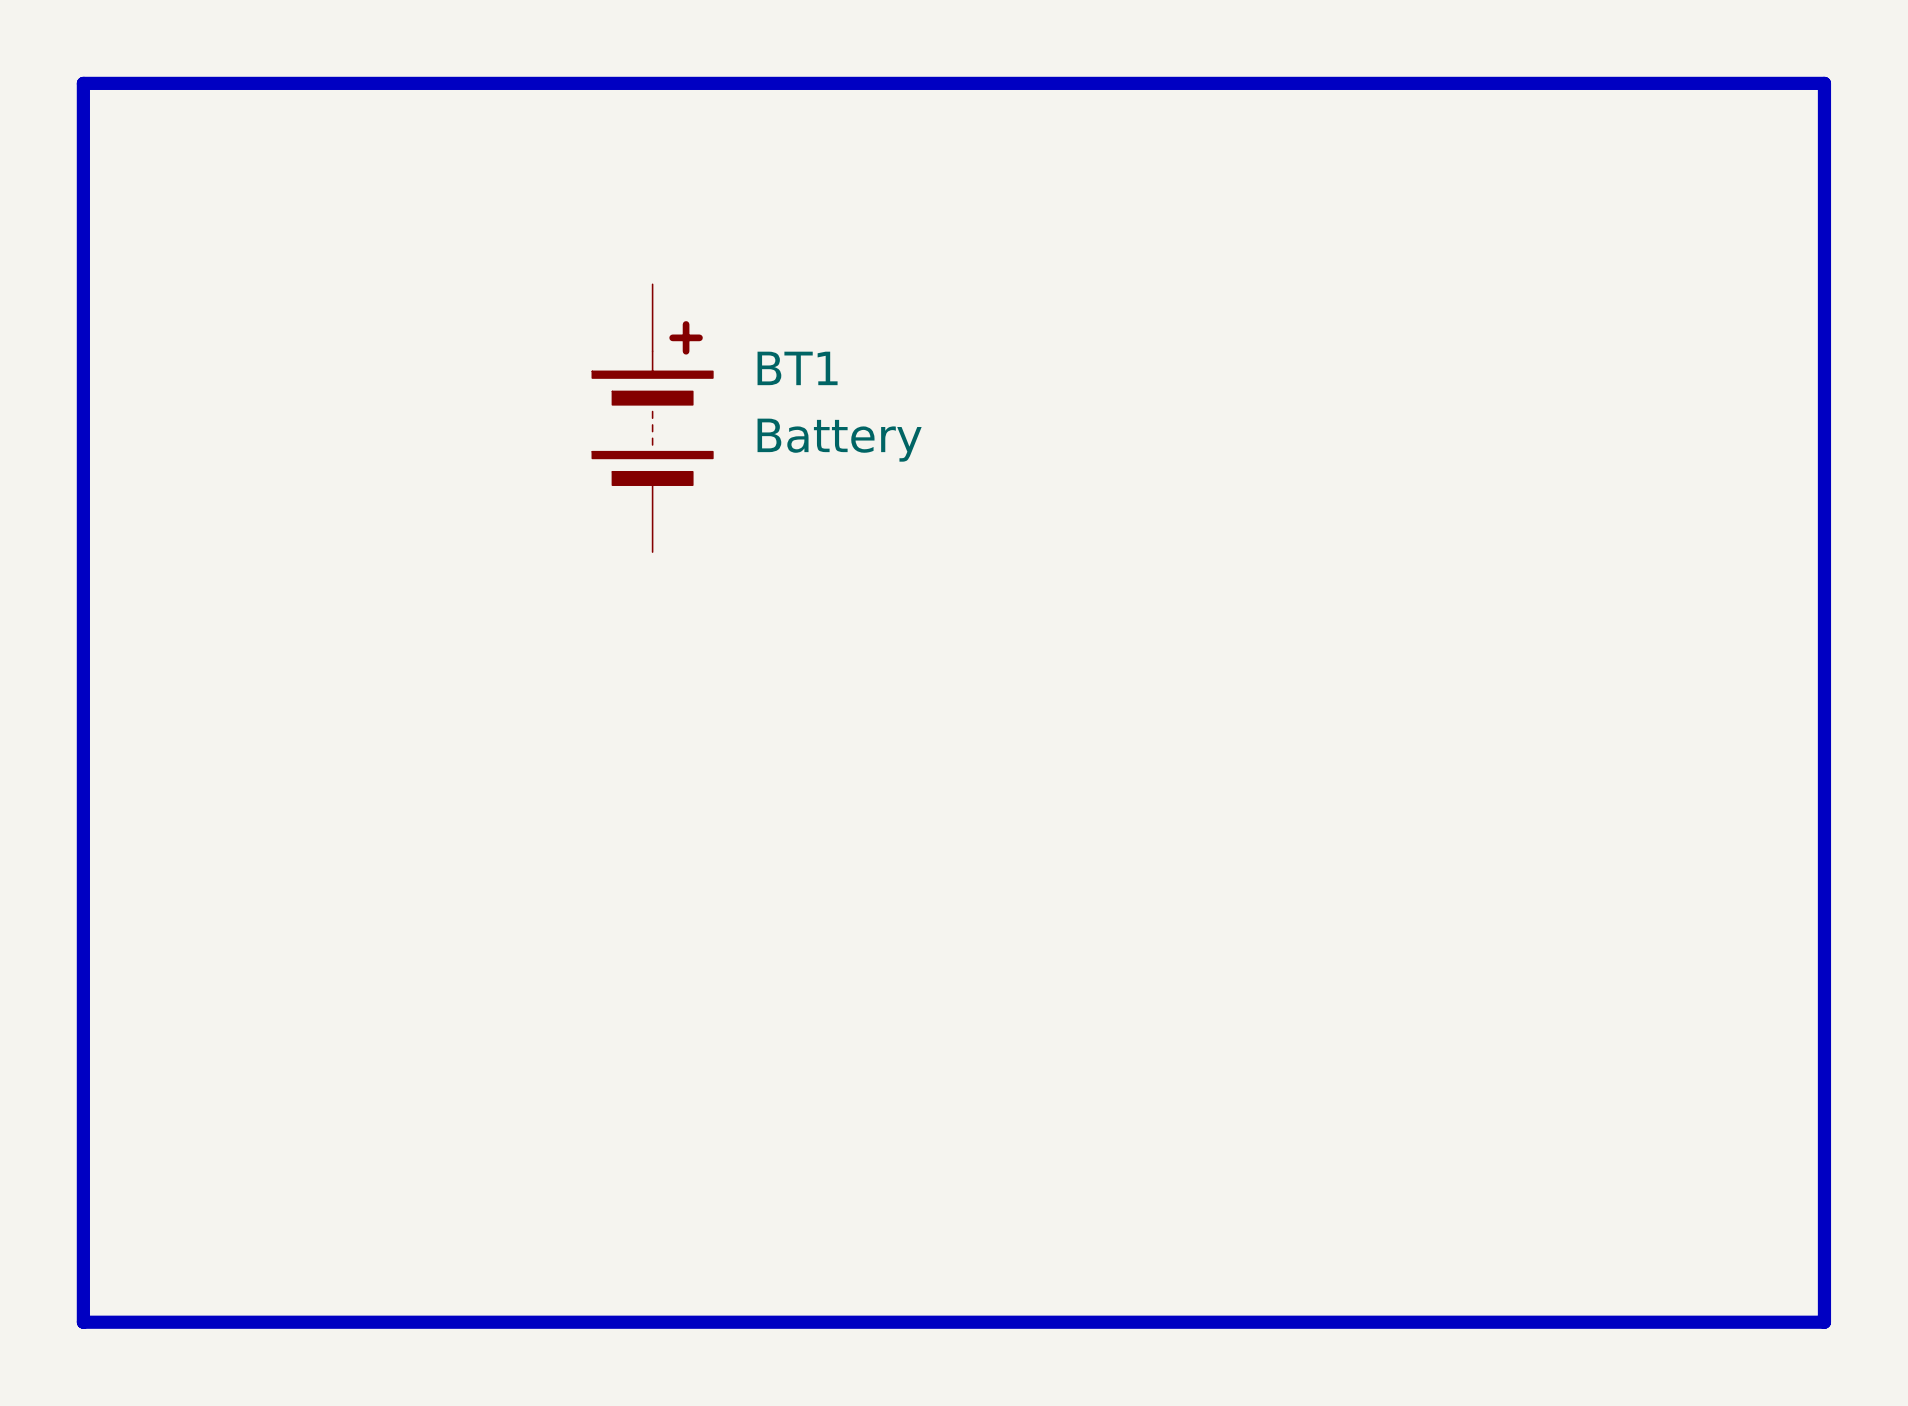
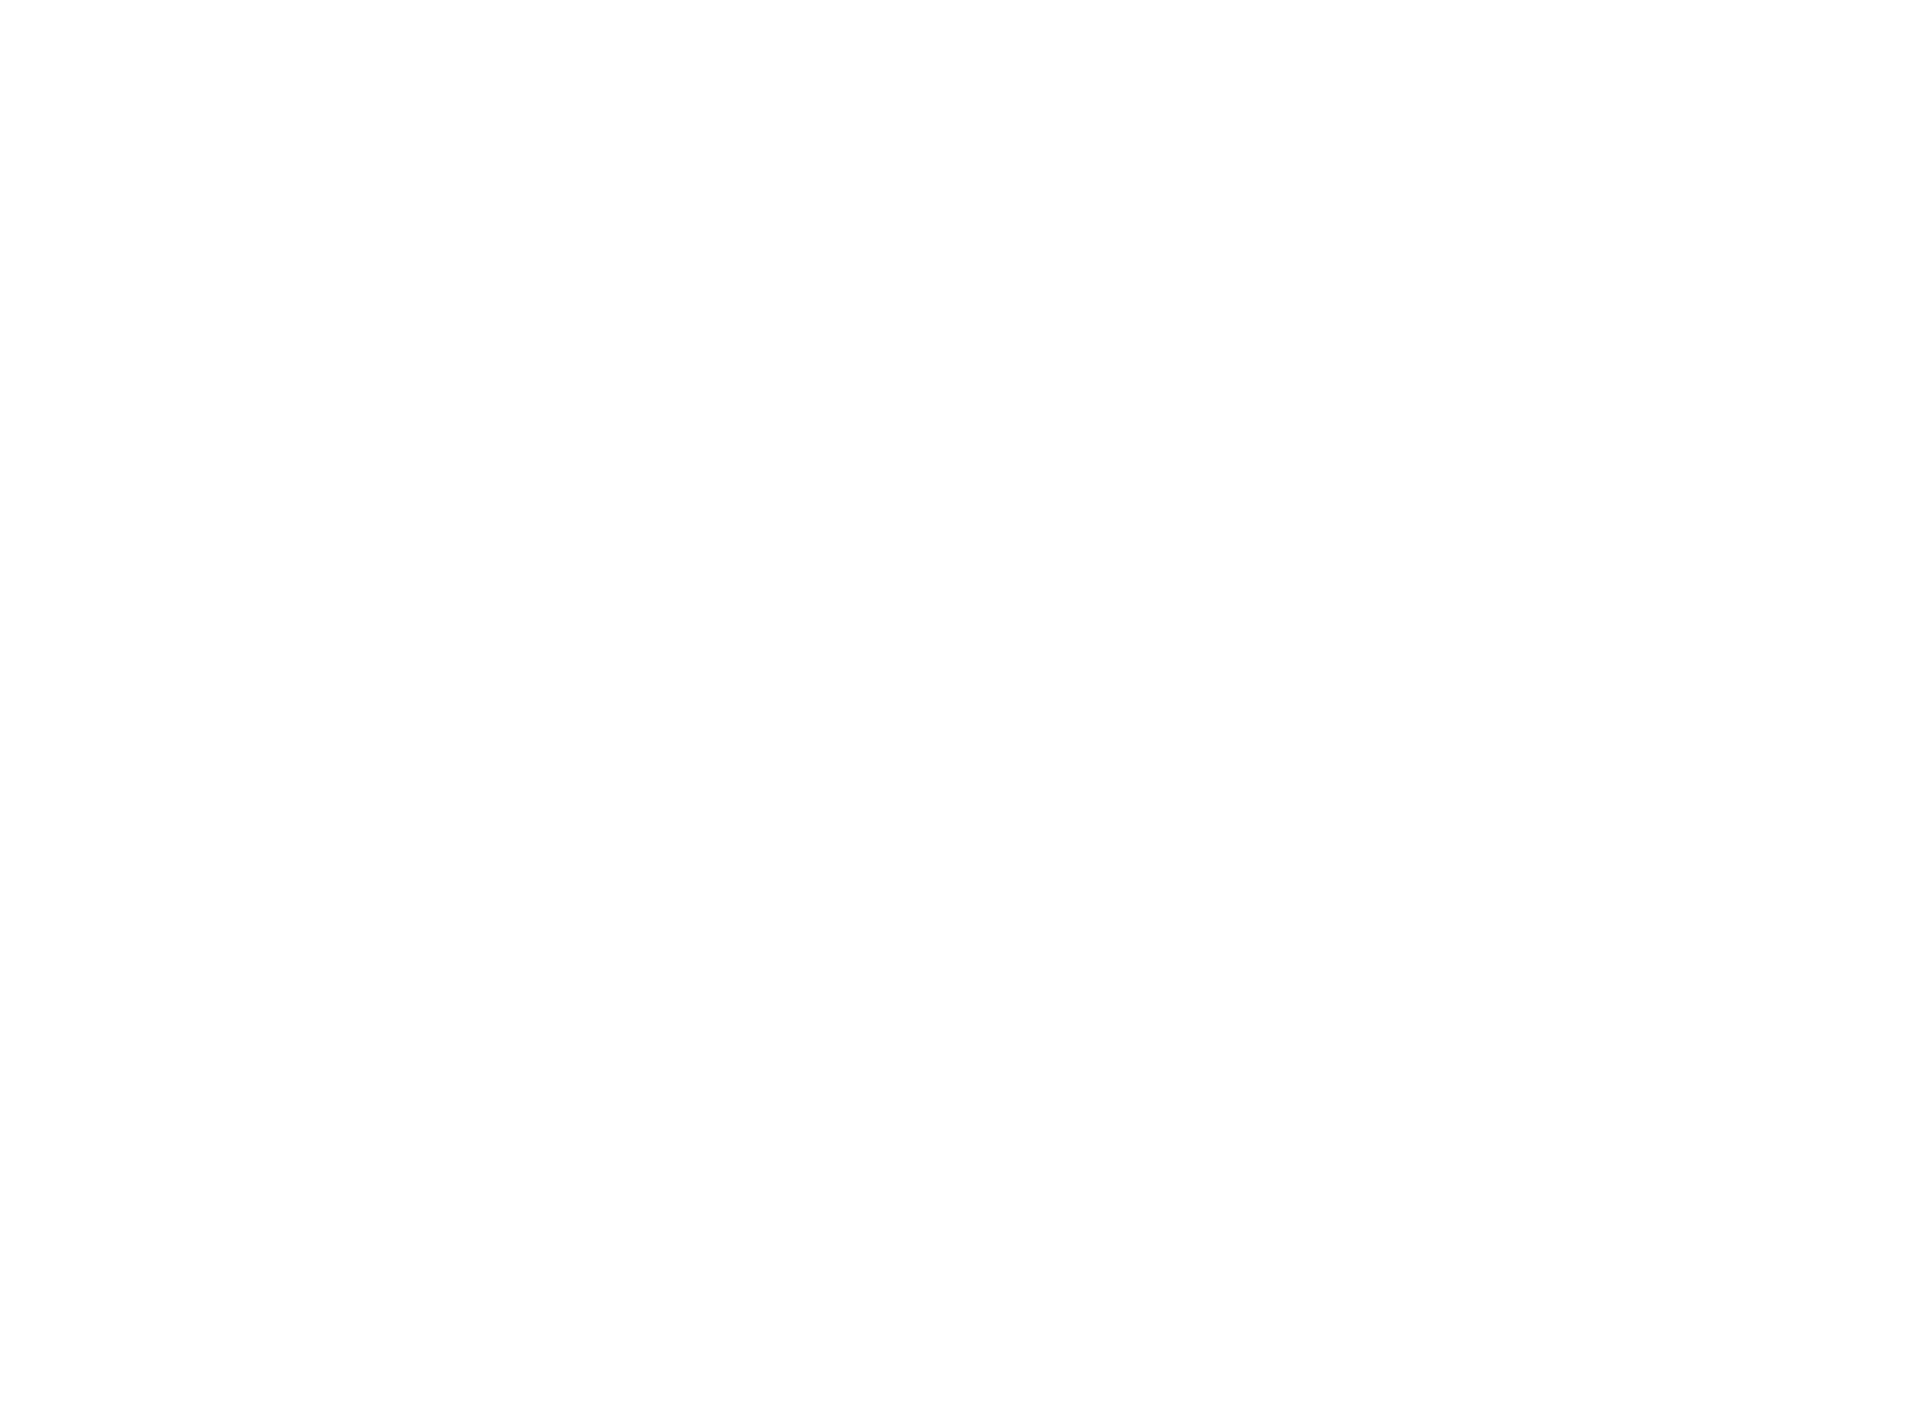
line: (83, 83) (1824, 83) (1824, 1322) (83, 1322) (83, 83) -> none
BT1: Battery (652, 418) -> none

